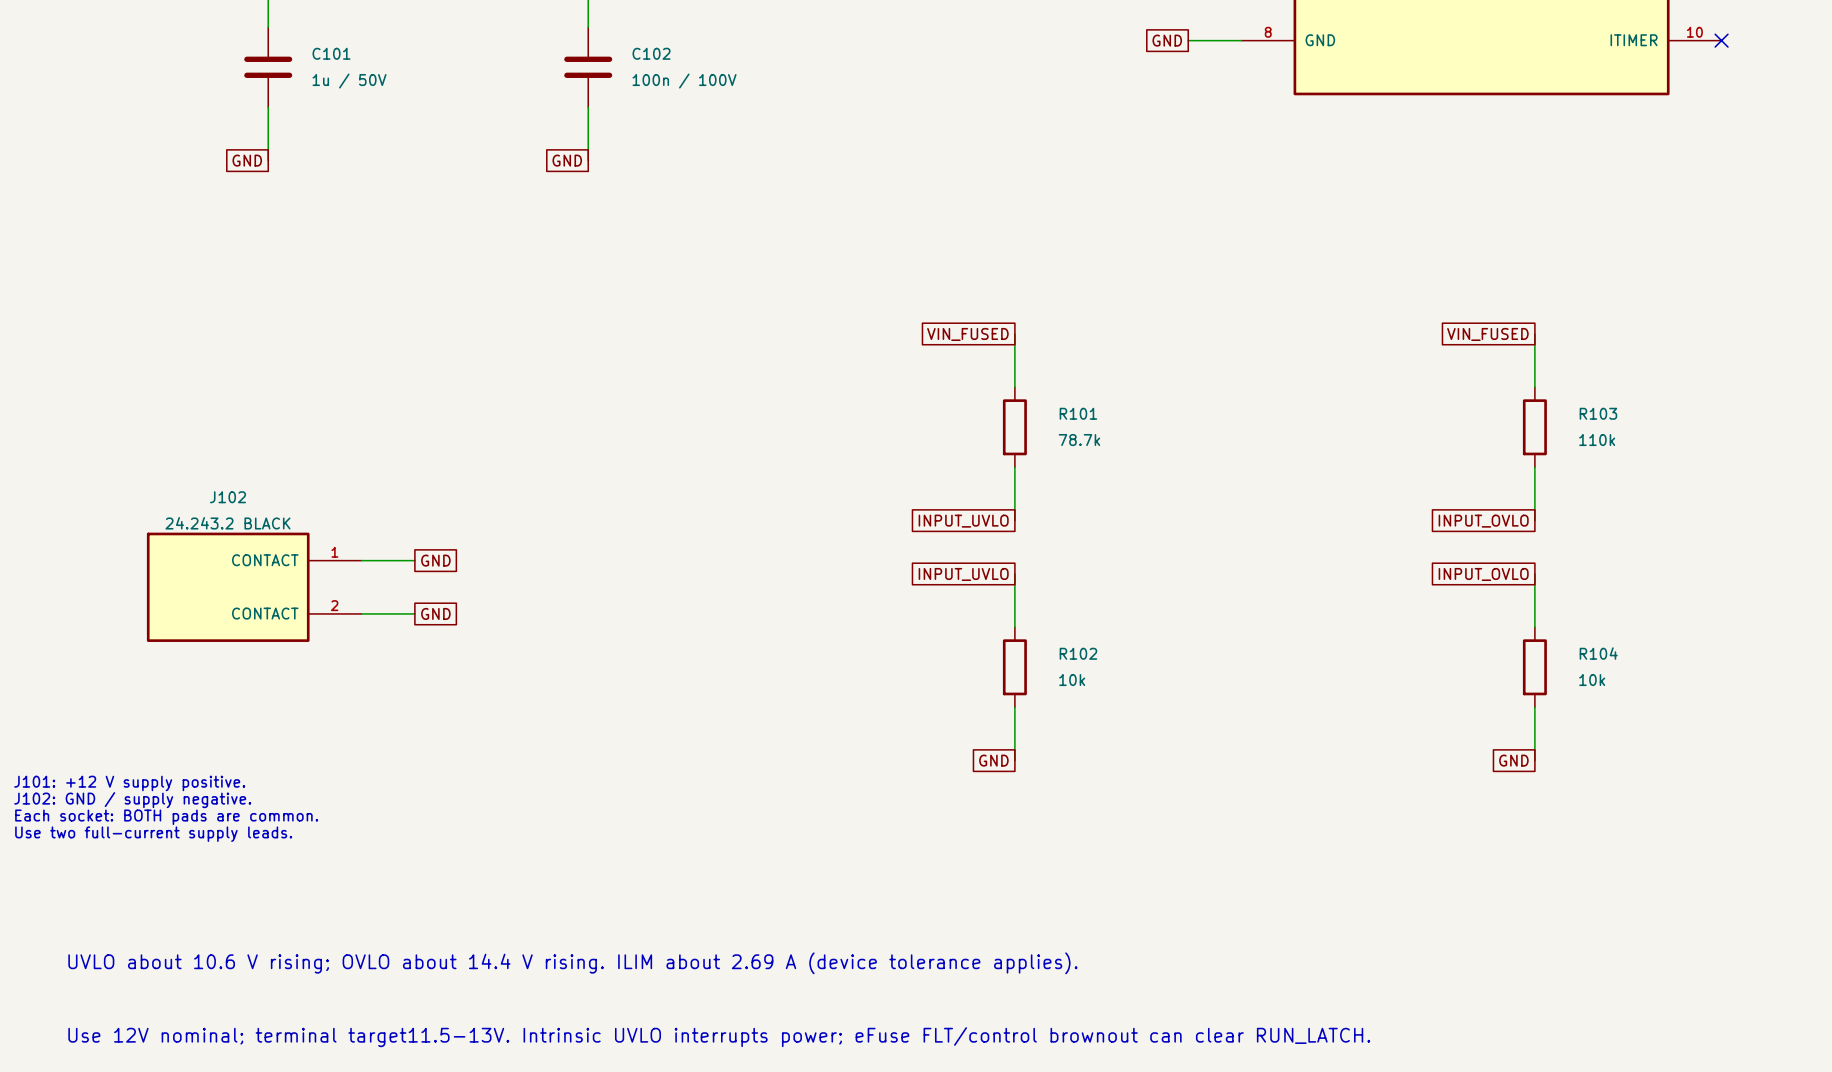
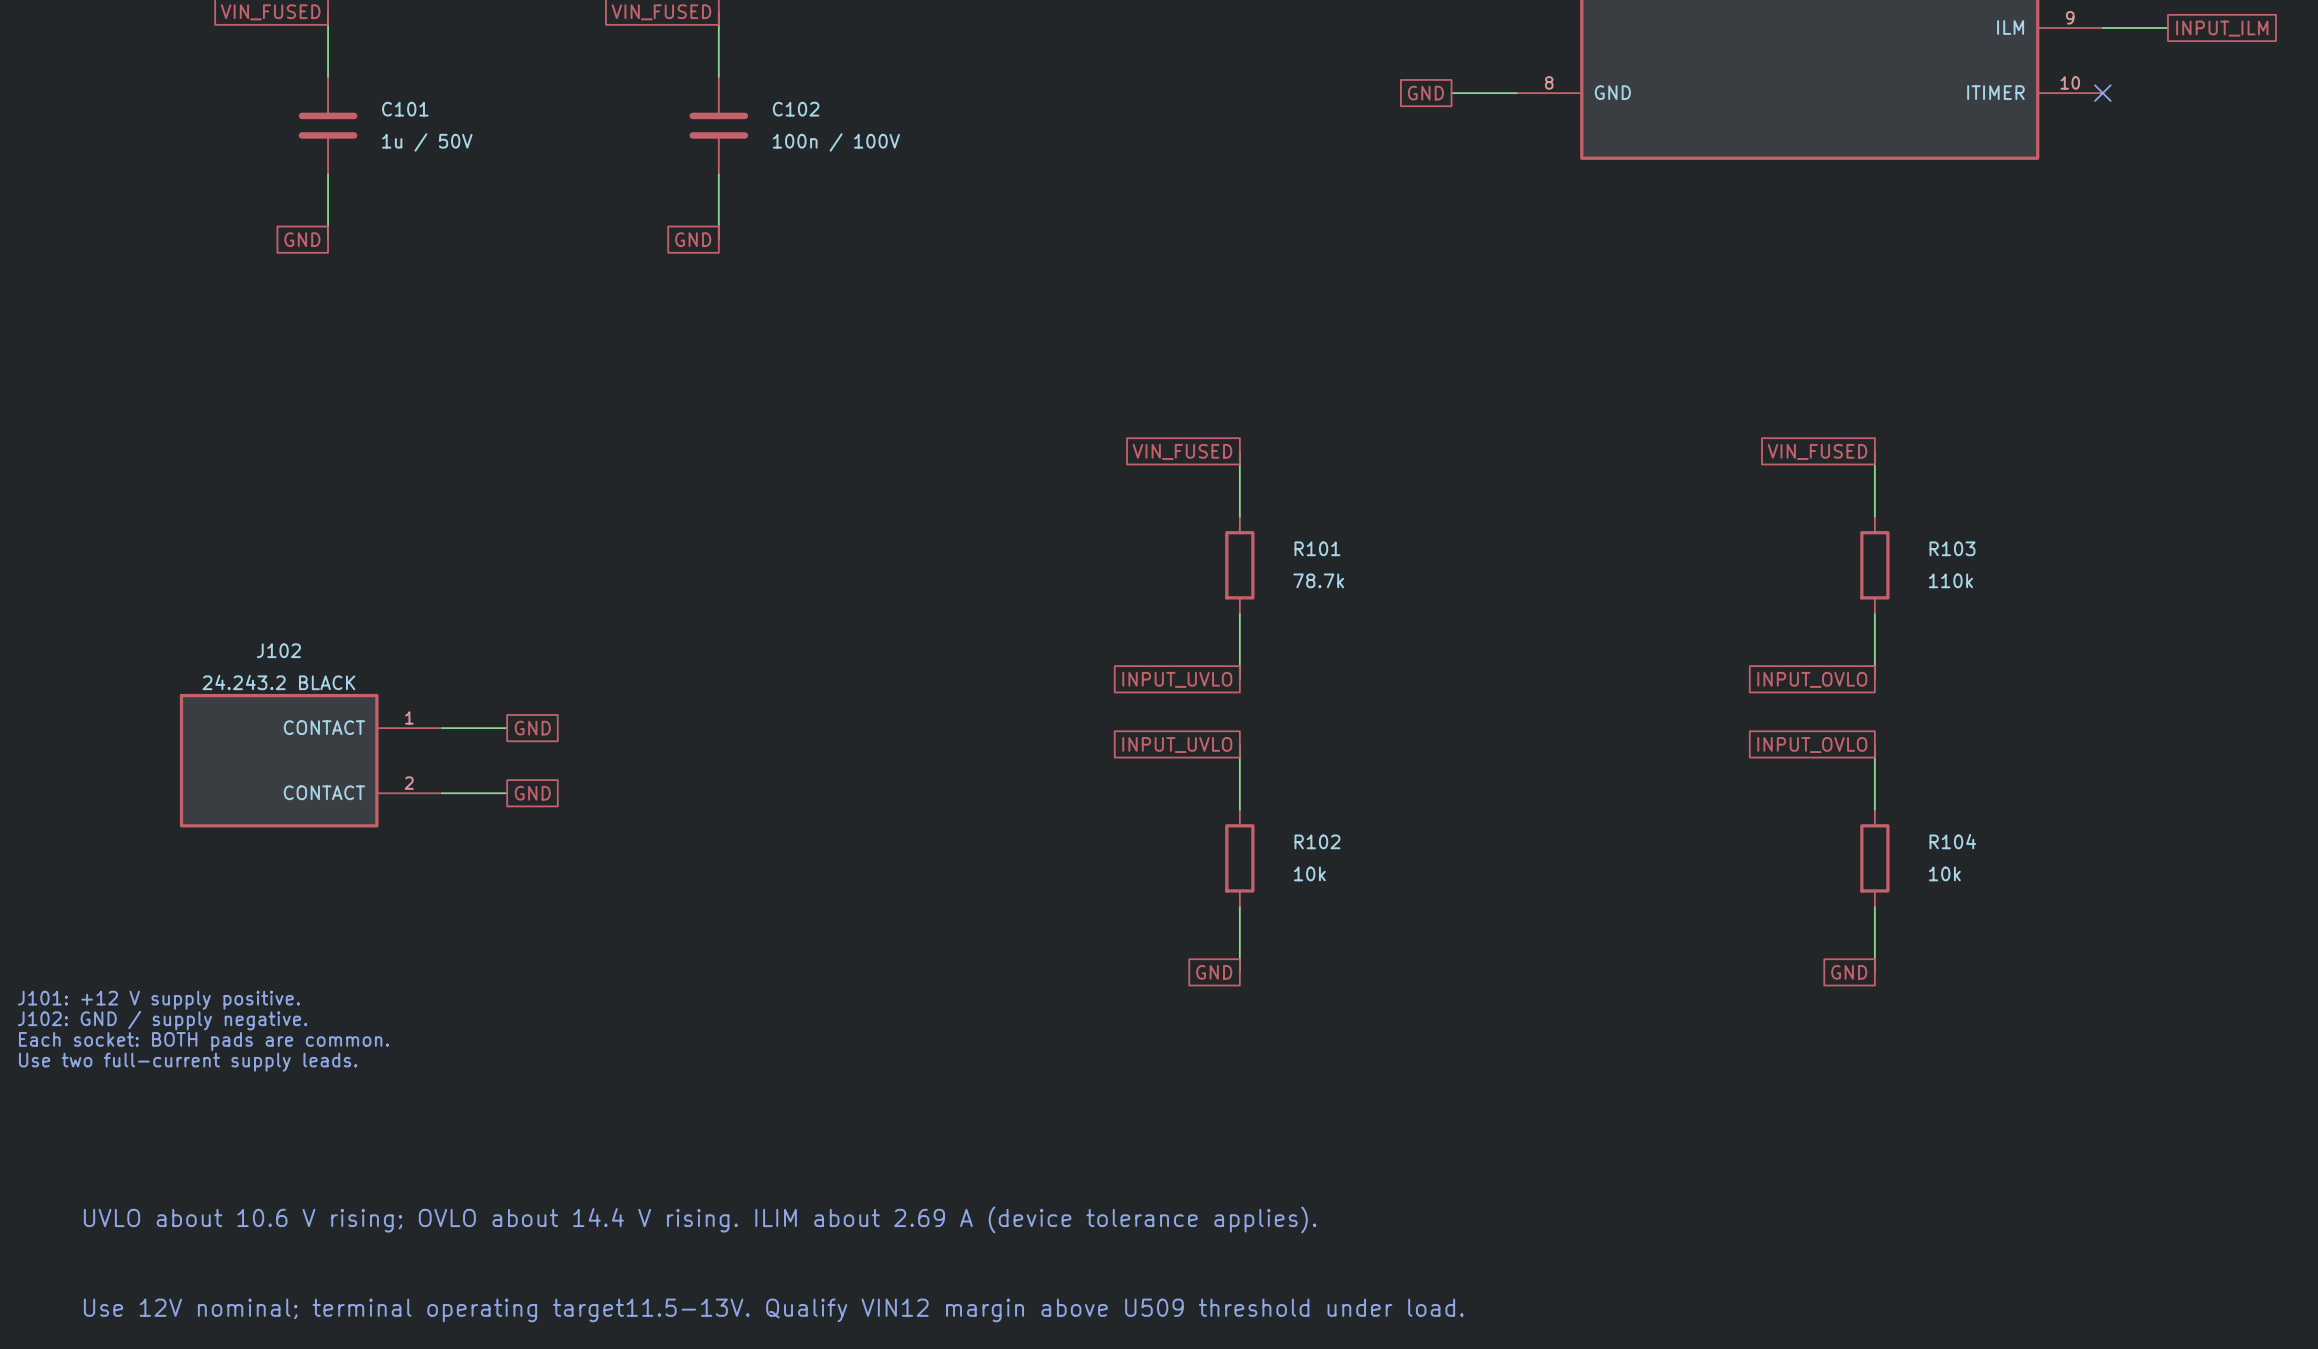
text: Use 12V nominal; terminal target11.5-13V. Intrinsic UVLO interrupts power; eFuse FLT/control brownout can clear RUN_LATCH. (719, 1037) -> Use 12V nominal; terminal operating target11.5-13V. Qualify VIN12 margin above U509 threshold under load. (773, 1310)

